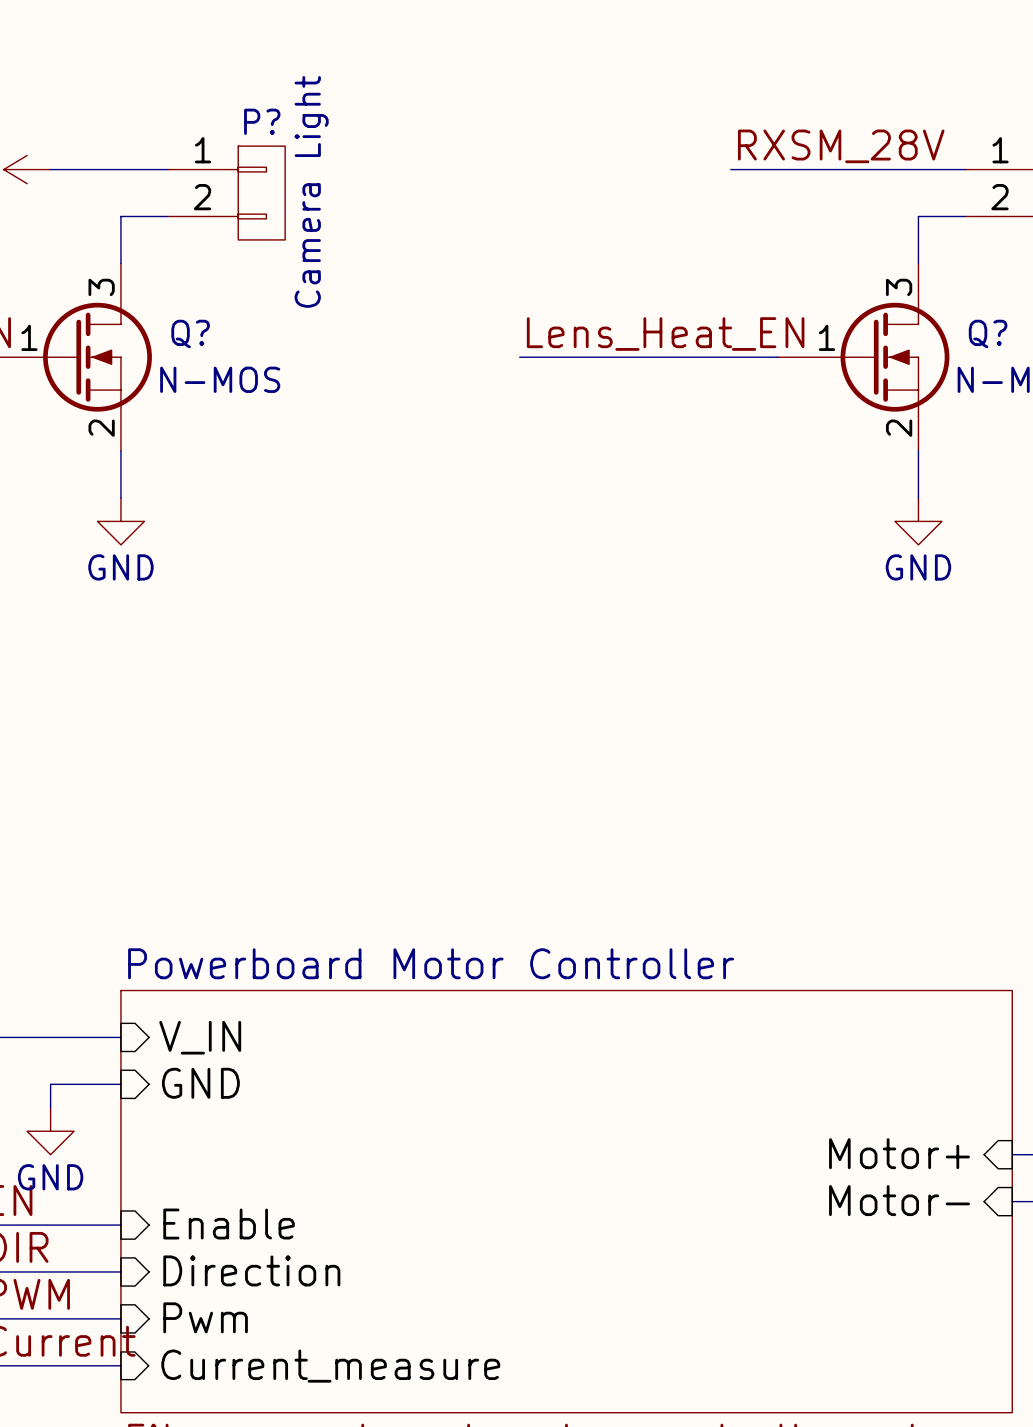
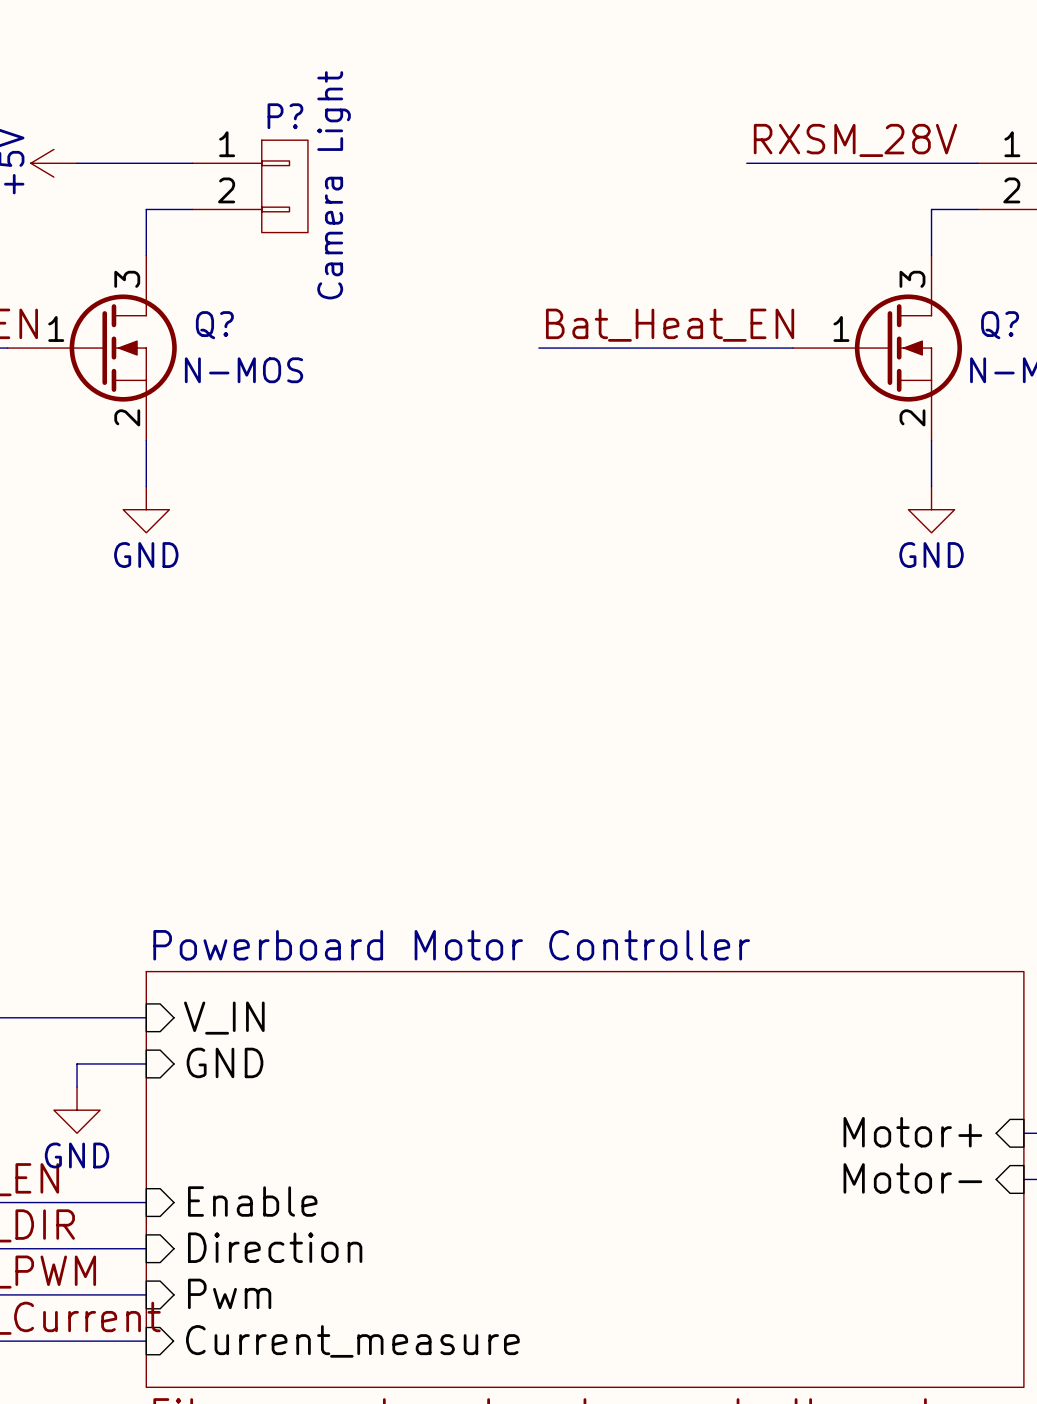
label: Lens_Heat_EN (665, 334) -> Bat_Heat_EN (670, 325)

